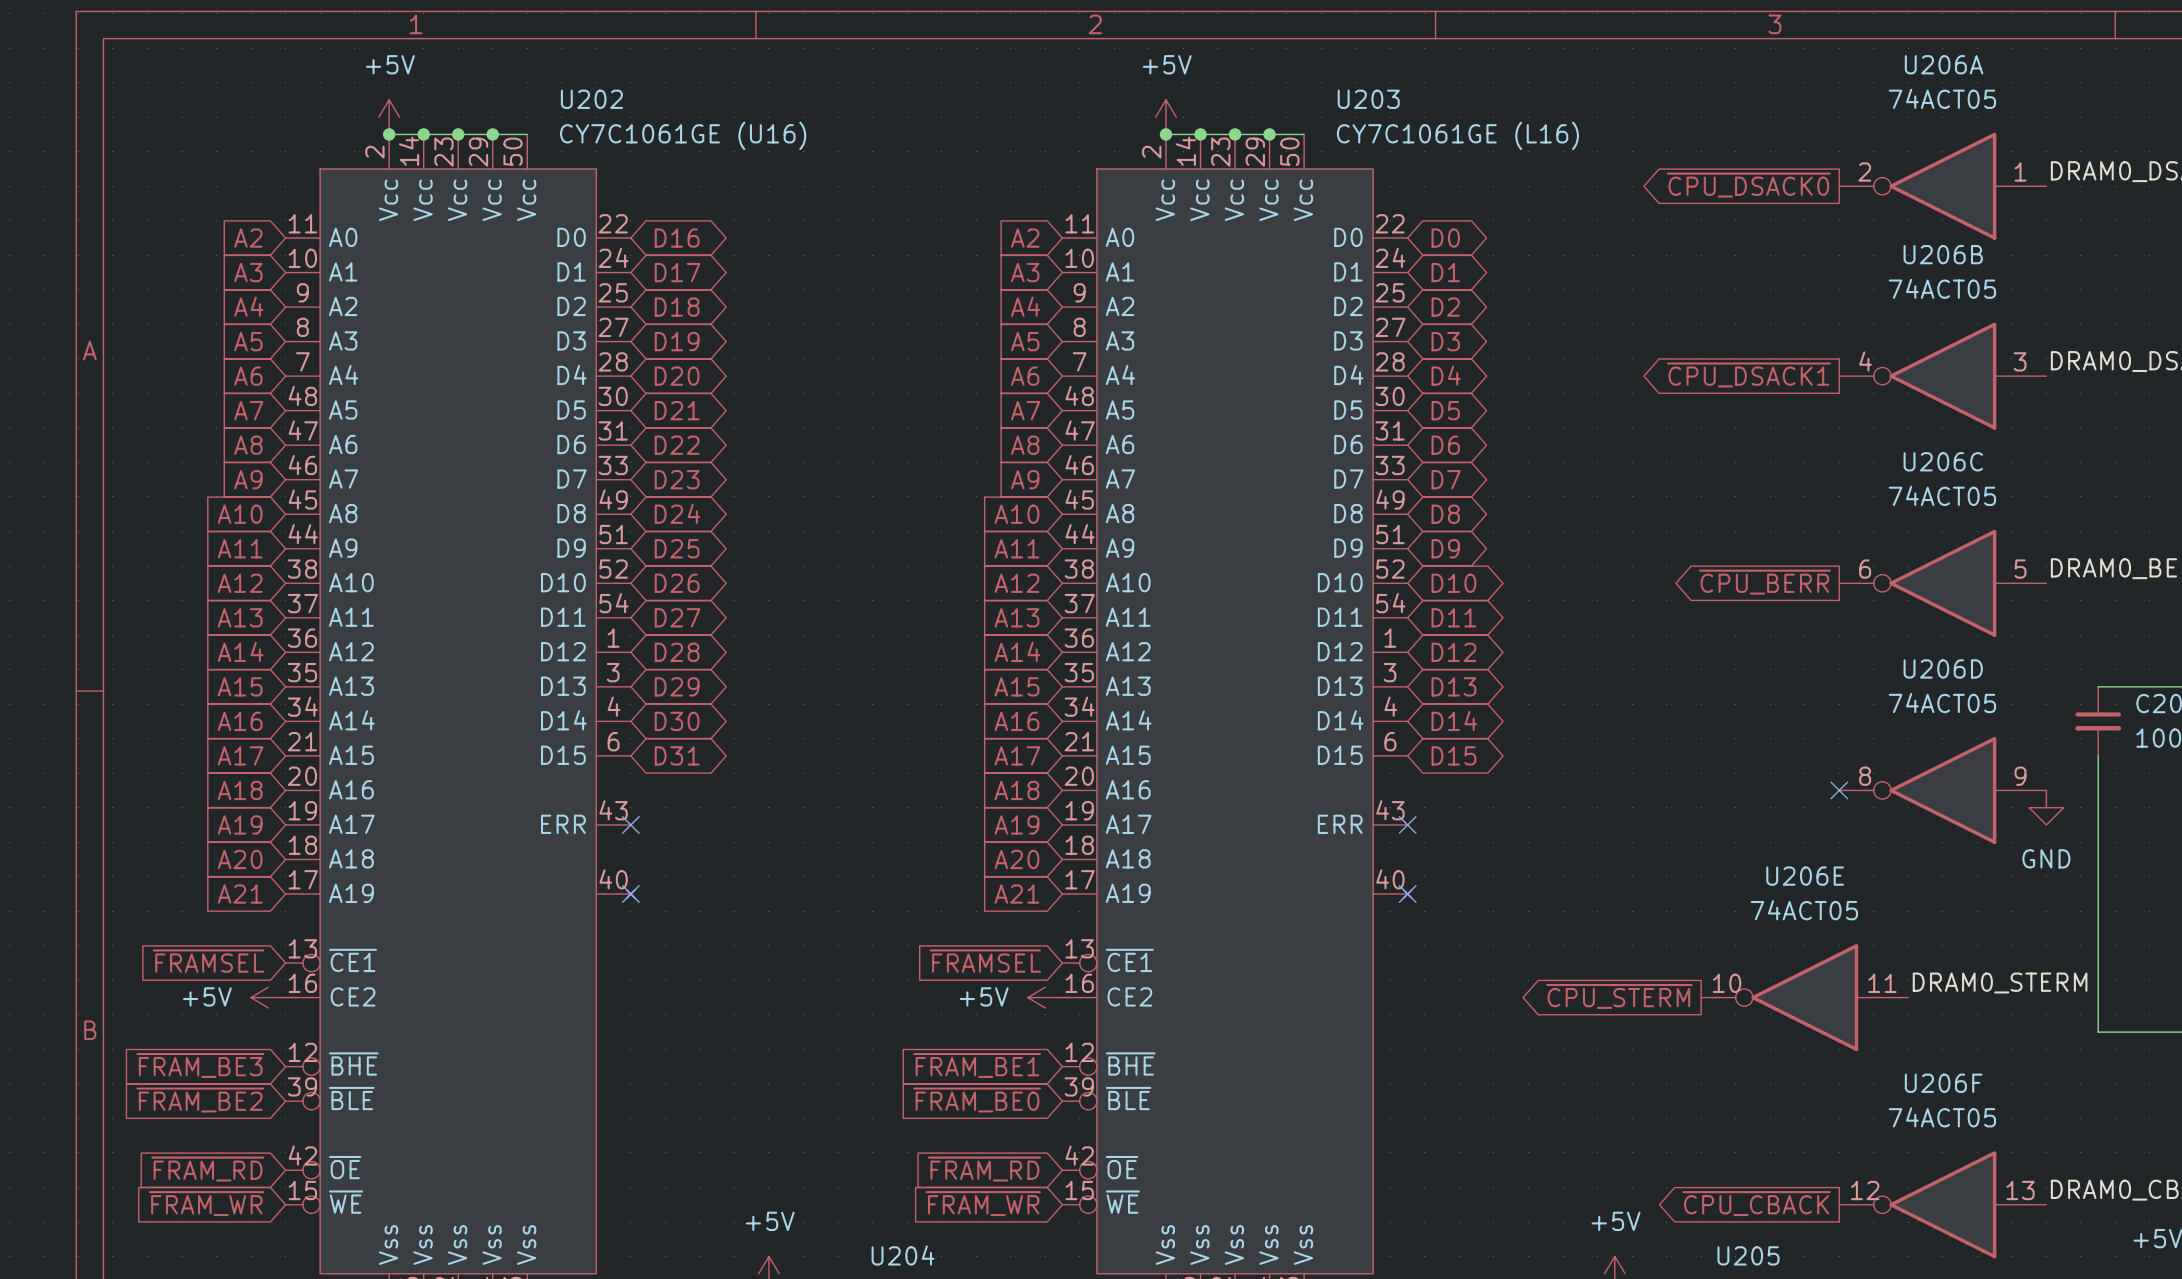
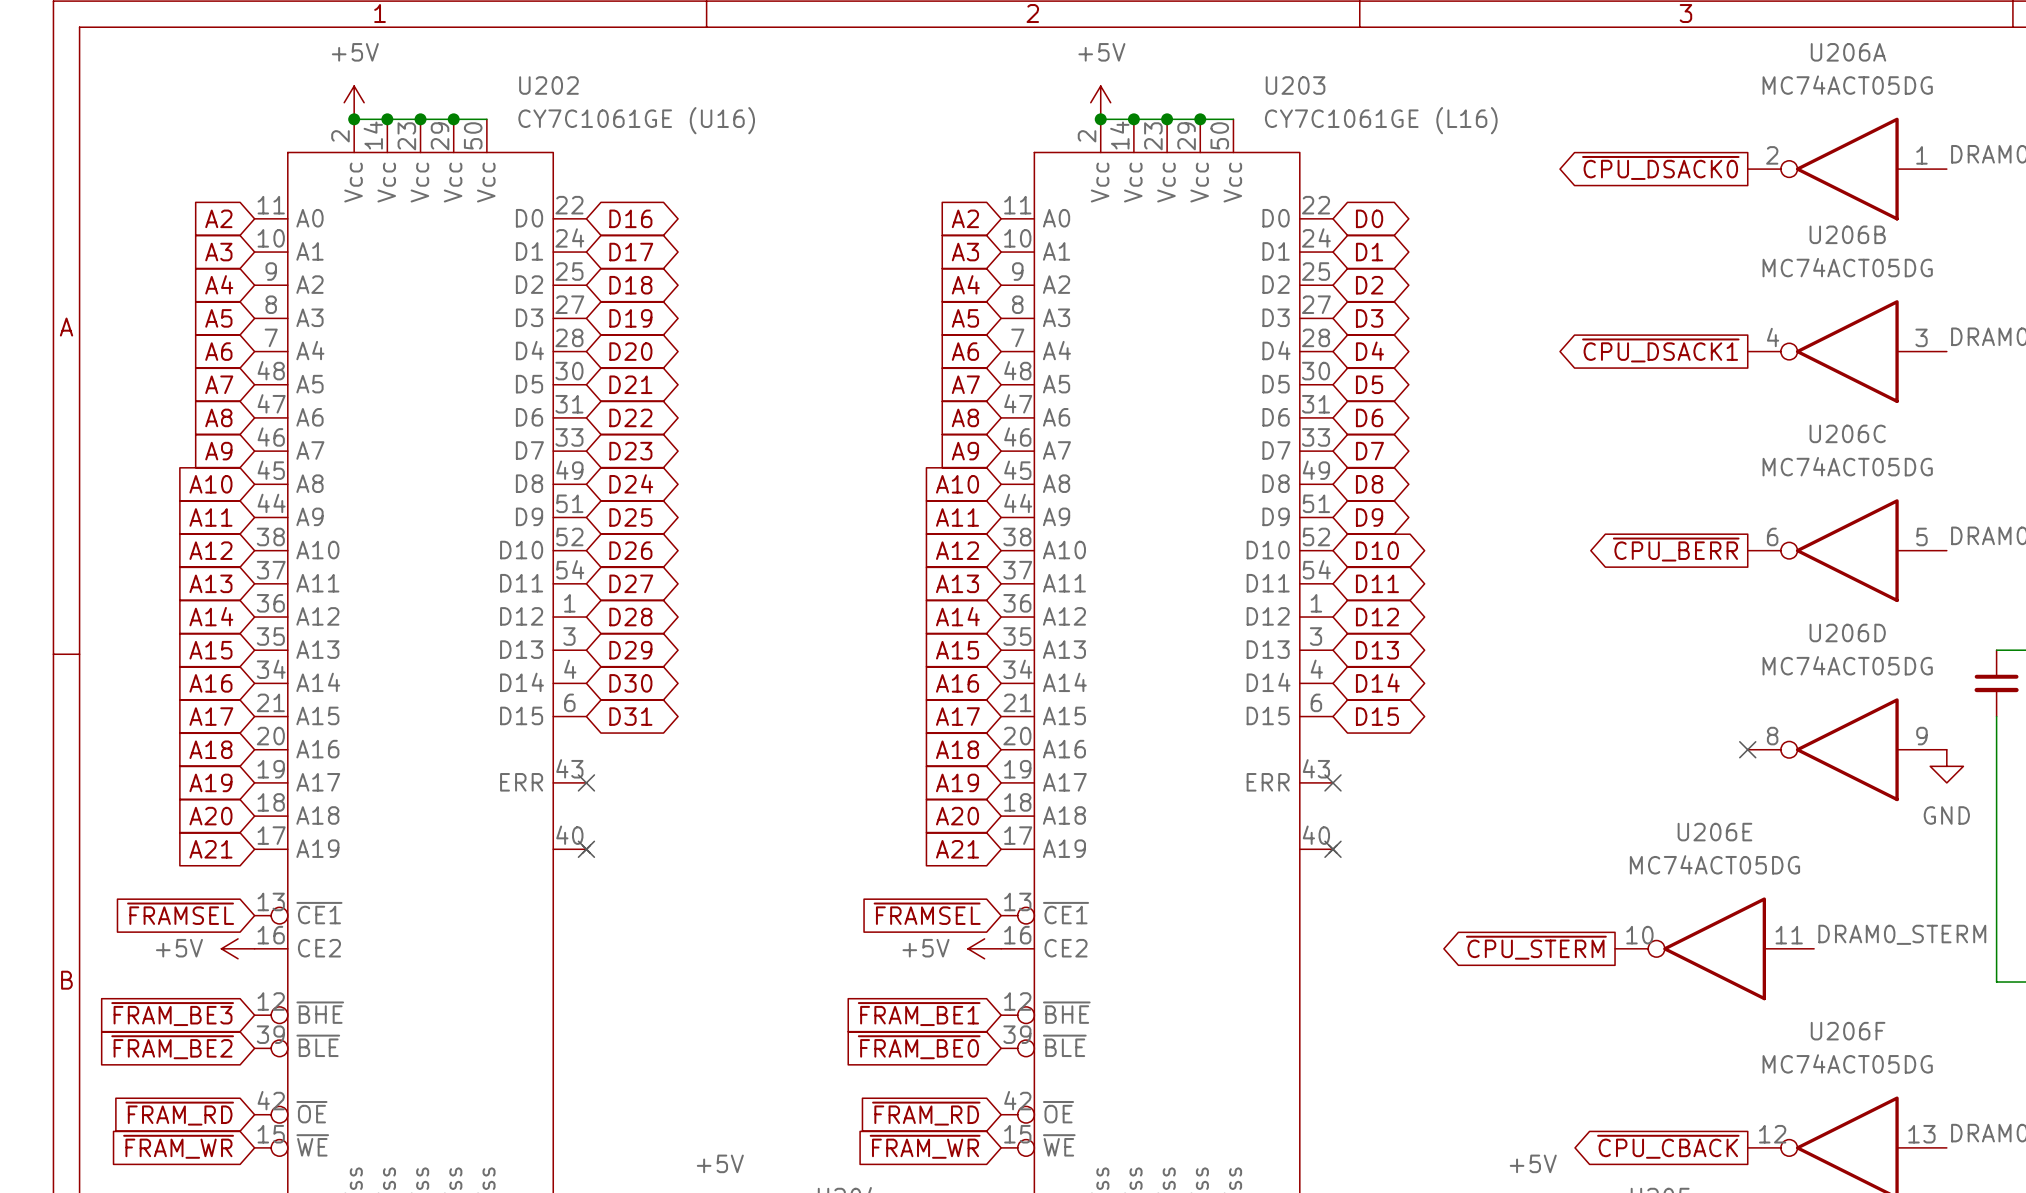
U206A value: 74ACT05 (1942, 98) -> MC74ACT05DG (1847, 85)
U206B value: 74ACT05 (1942, 288) -> MC74ACT05DG (1847, 267)
U206C value: 74ACT05 (1942, 495) -> MC74ACT05DG (1847, 466)
U206D value: 74ACT05 (1942, 703) -> MC74ACT05DG (1847, 665)
U206E value: 74ACT05 (1804, 910) -> MC74ACT05DG (1714, 864)
U206F value: 74ACT05 (1942, 1117) -> MC74ACT05DG (1847, 1063)

